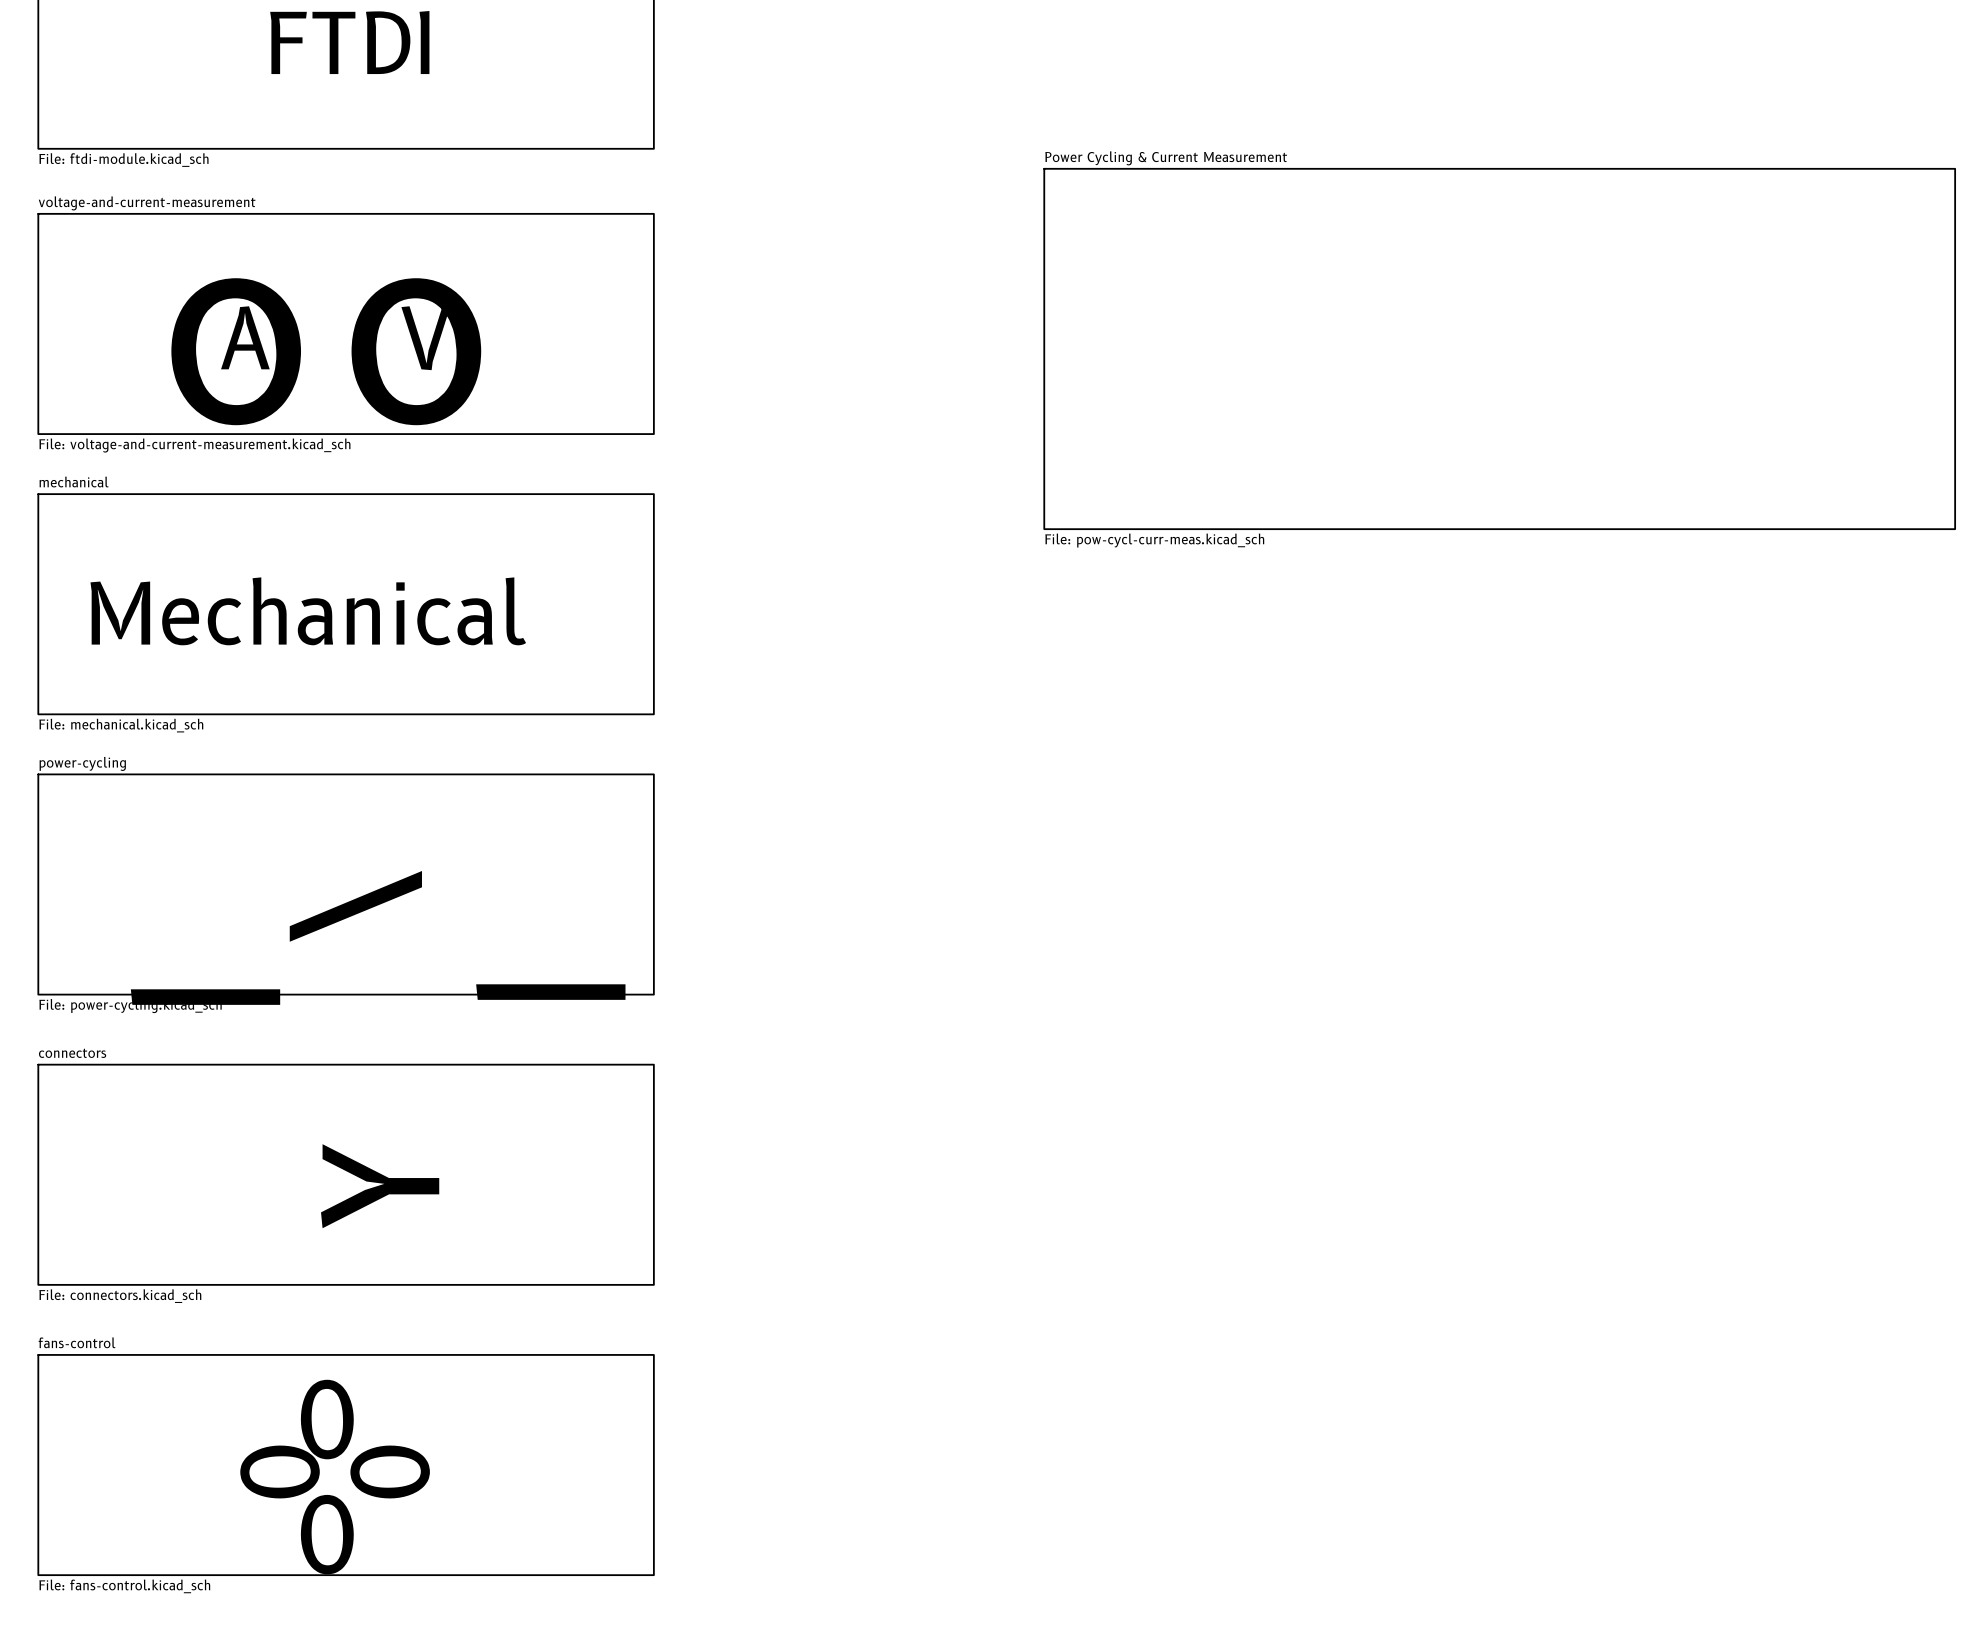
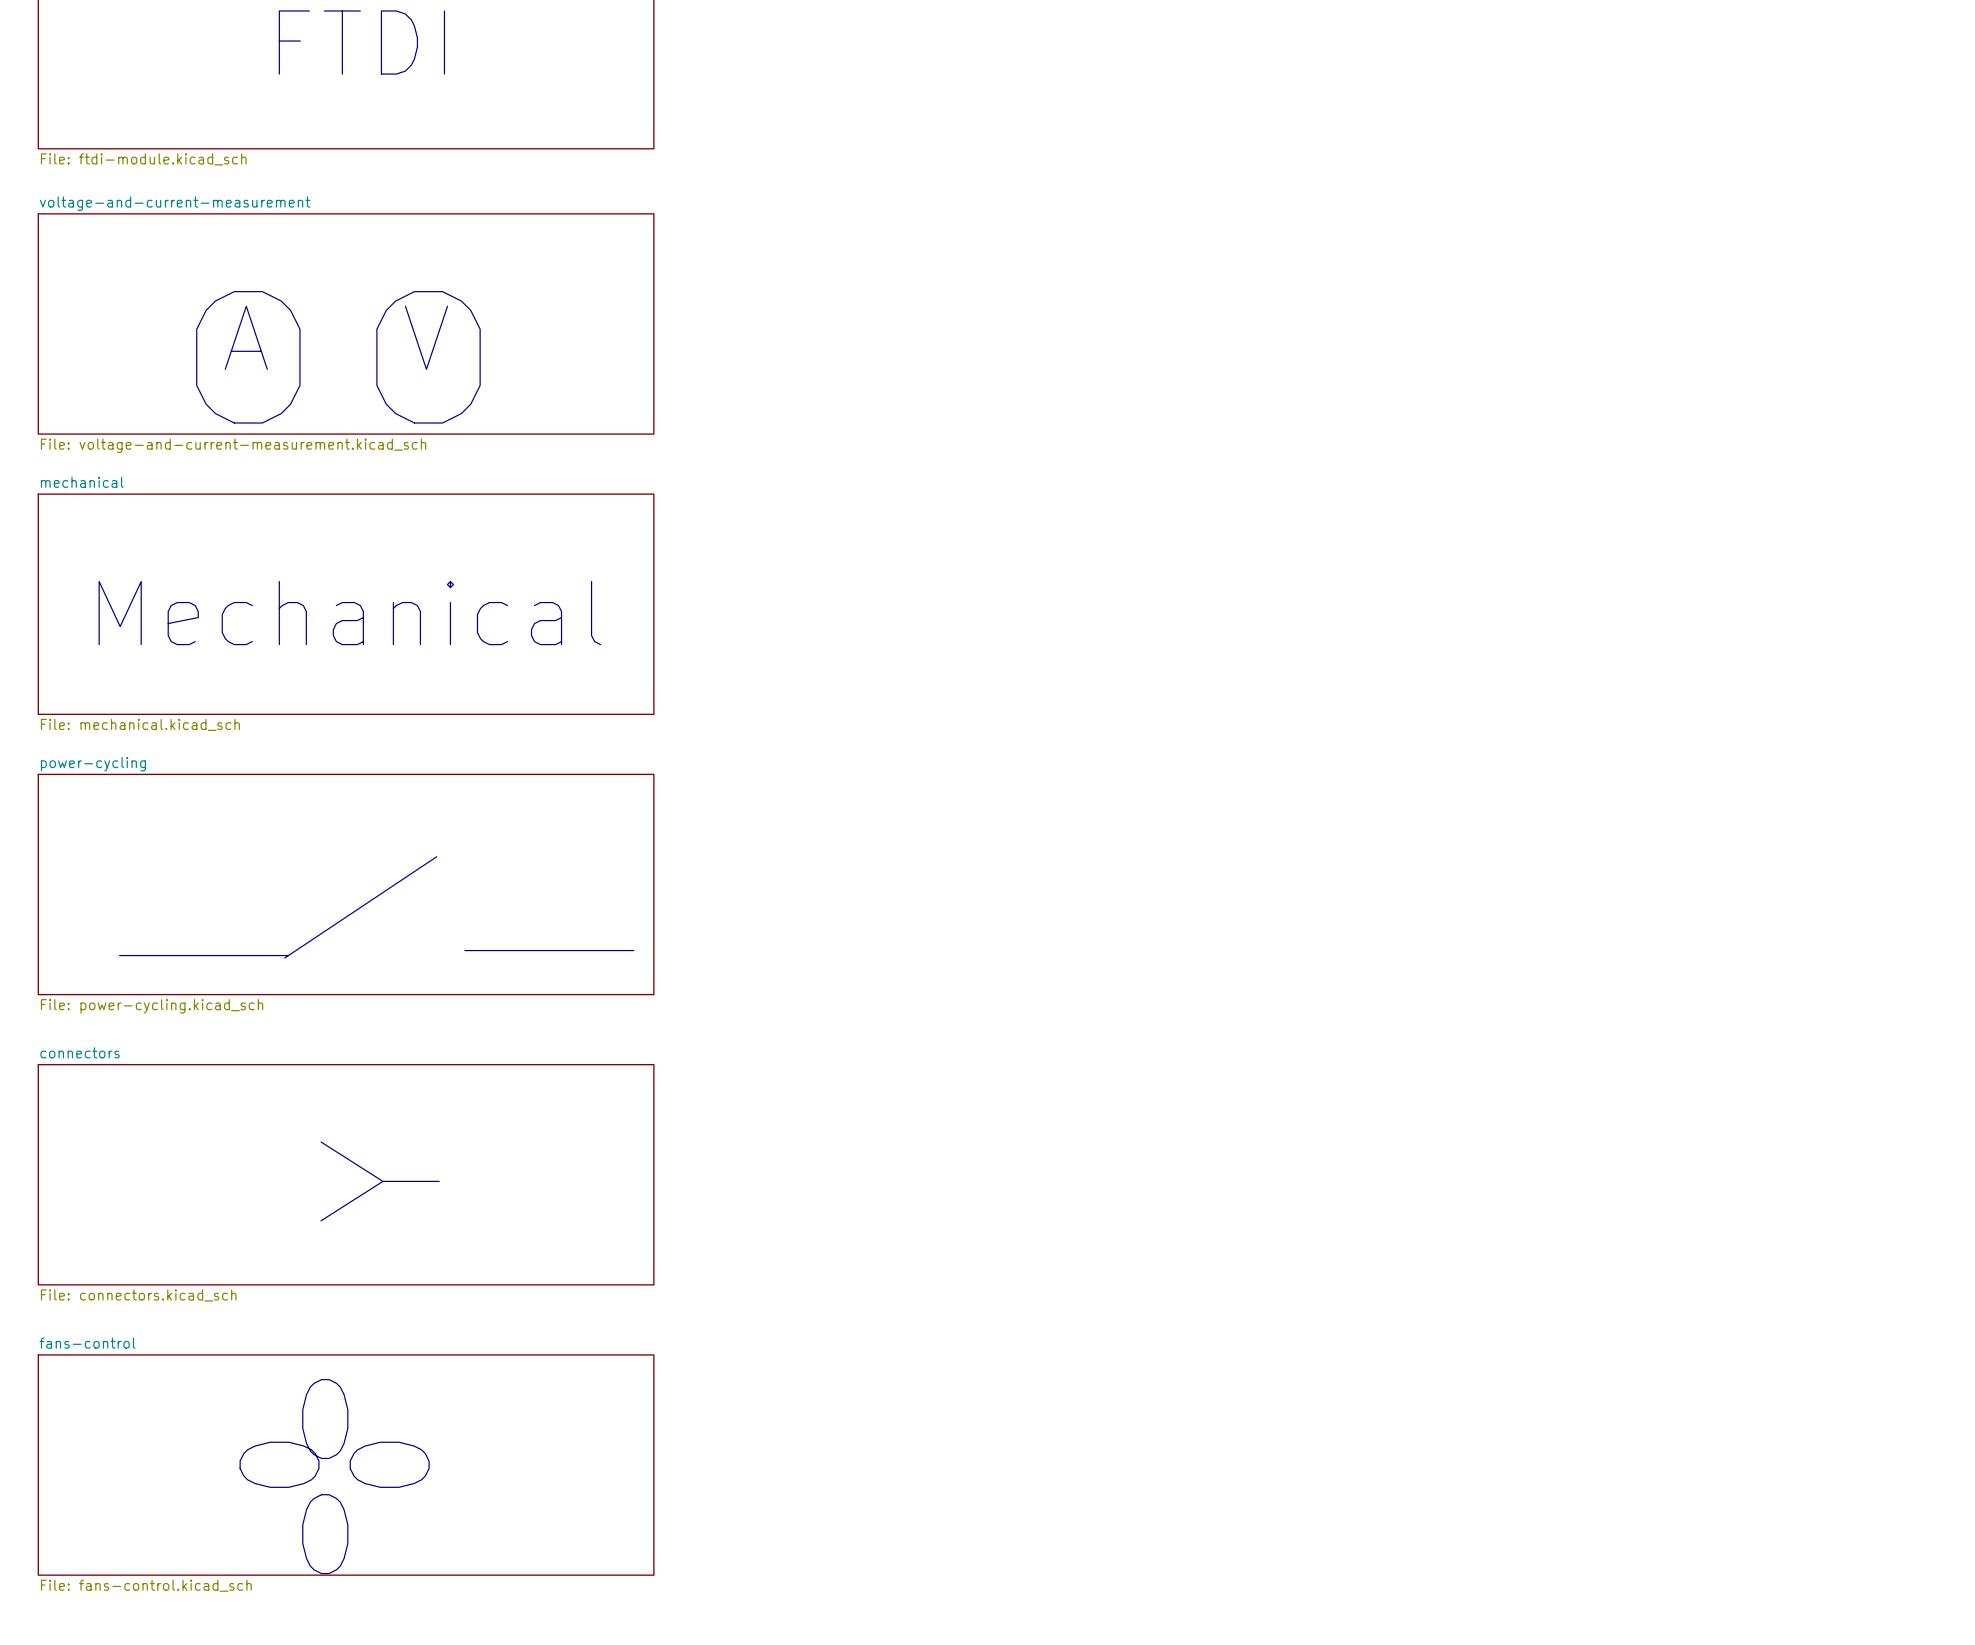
sheet Power Cycling & Current Measurement: File: pow-cycl-curr-meas.kicad_sch (1499, 348) -> none

